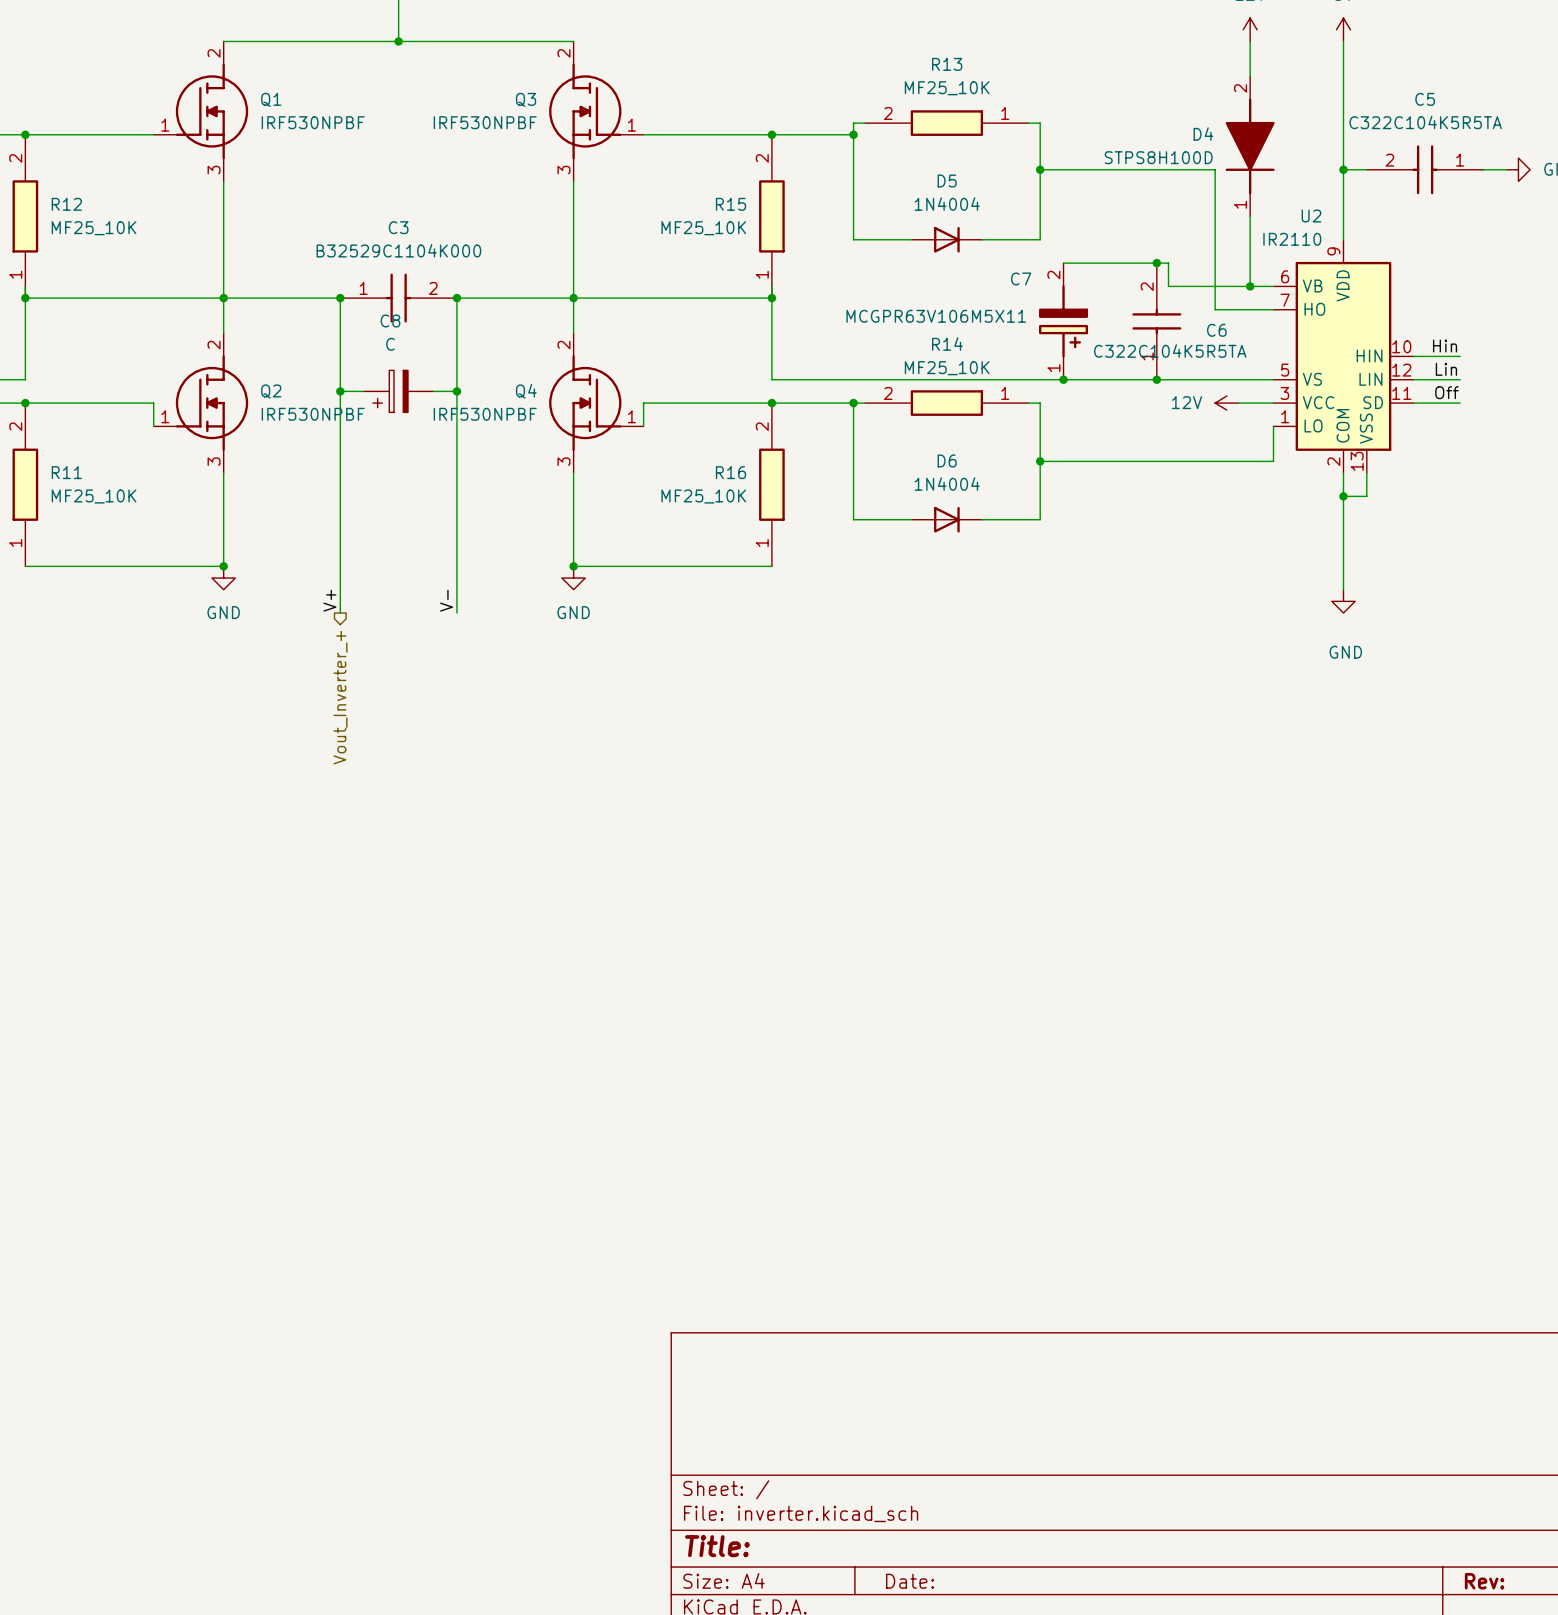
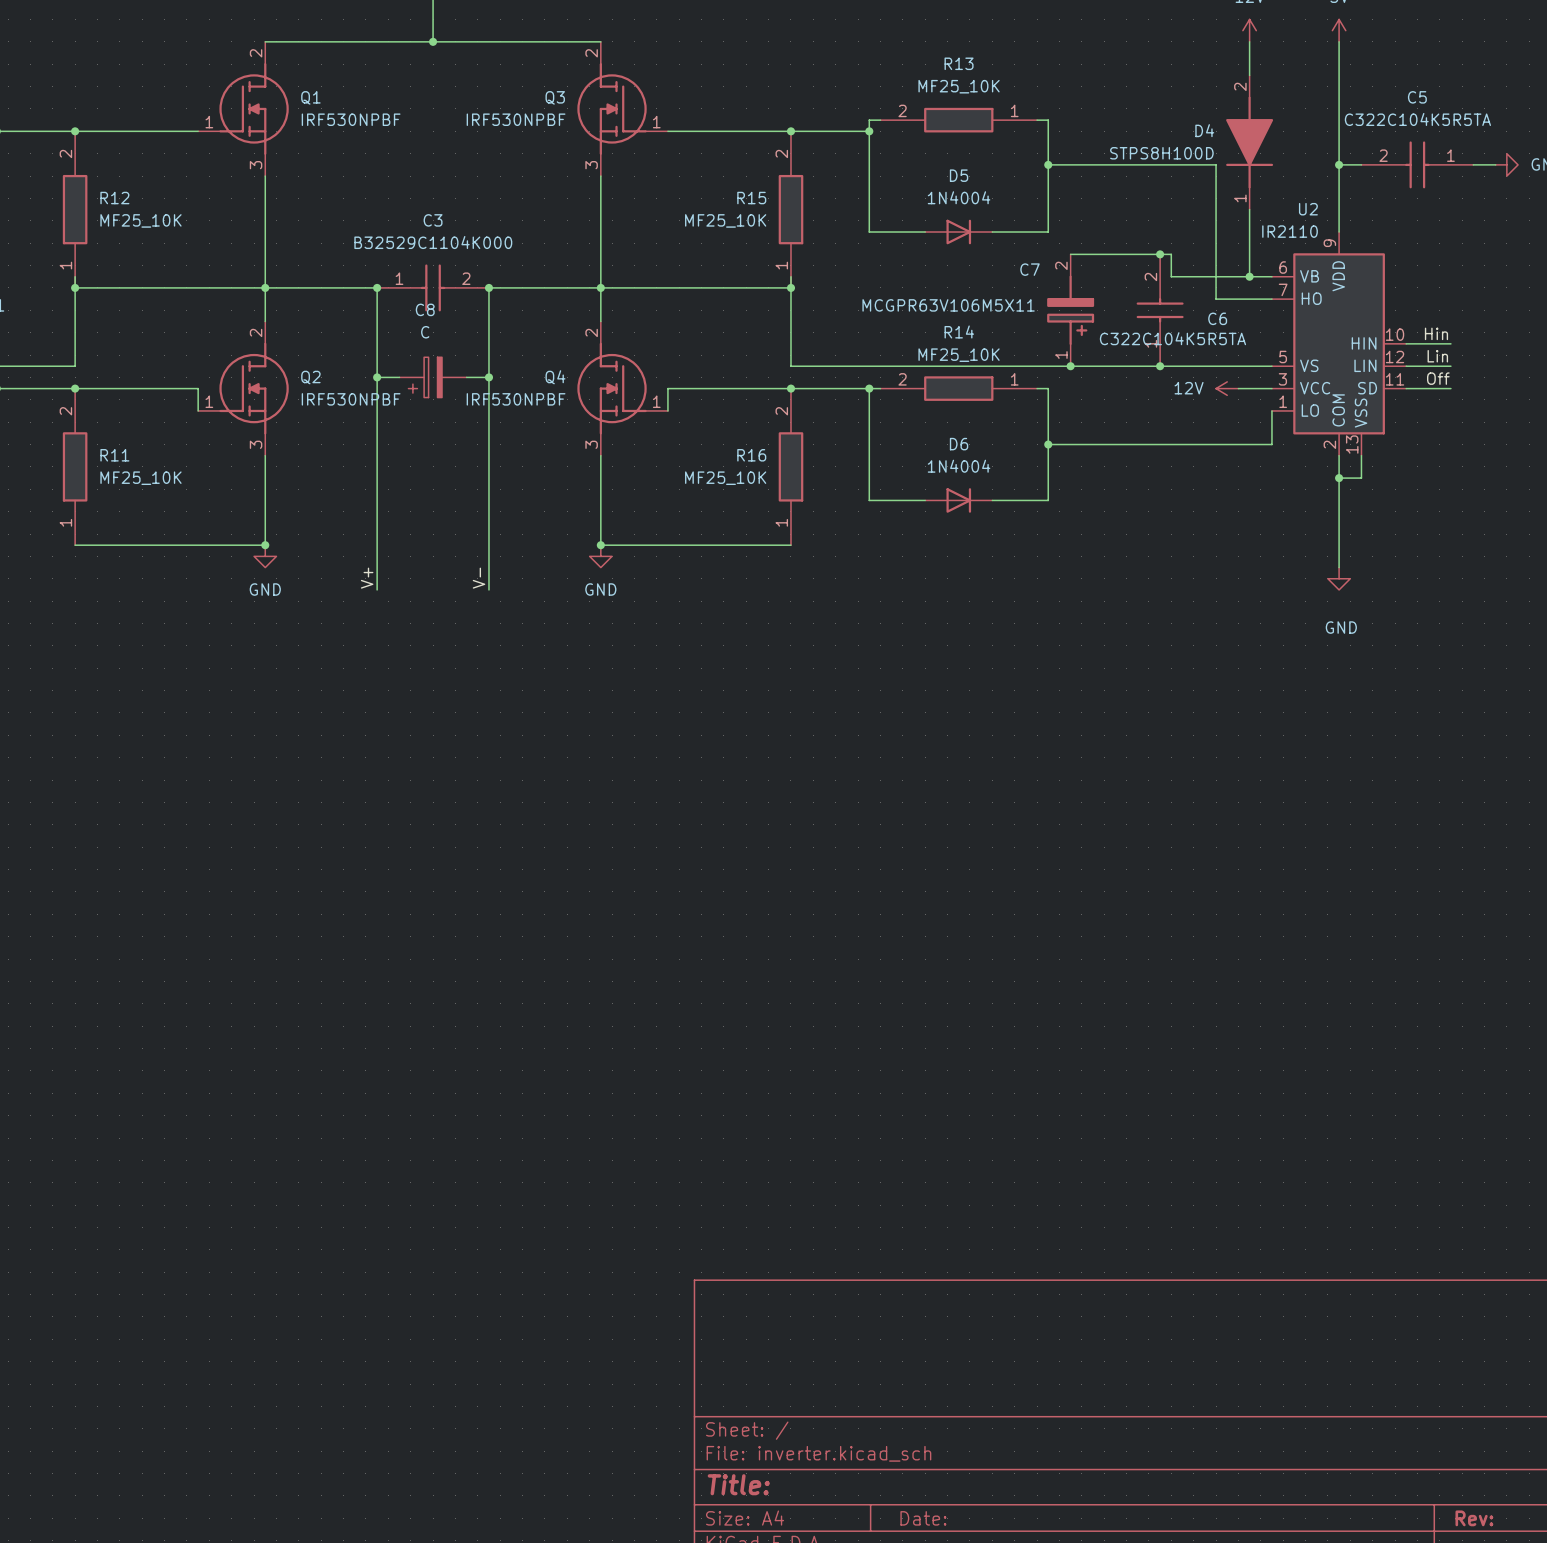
hierarchical label: Vout_Inverter_+ (340, 697) -> none

